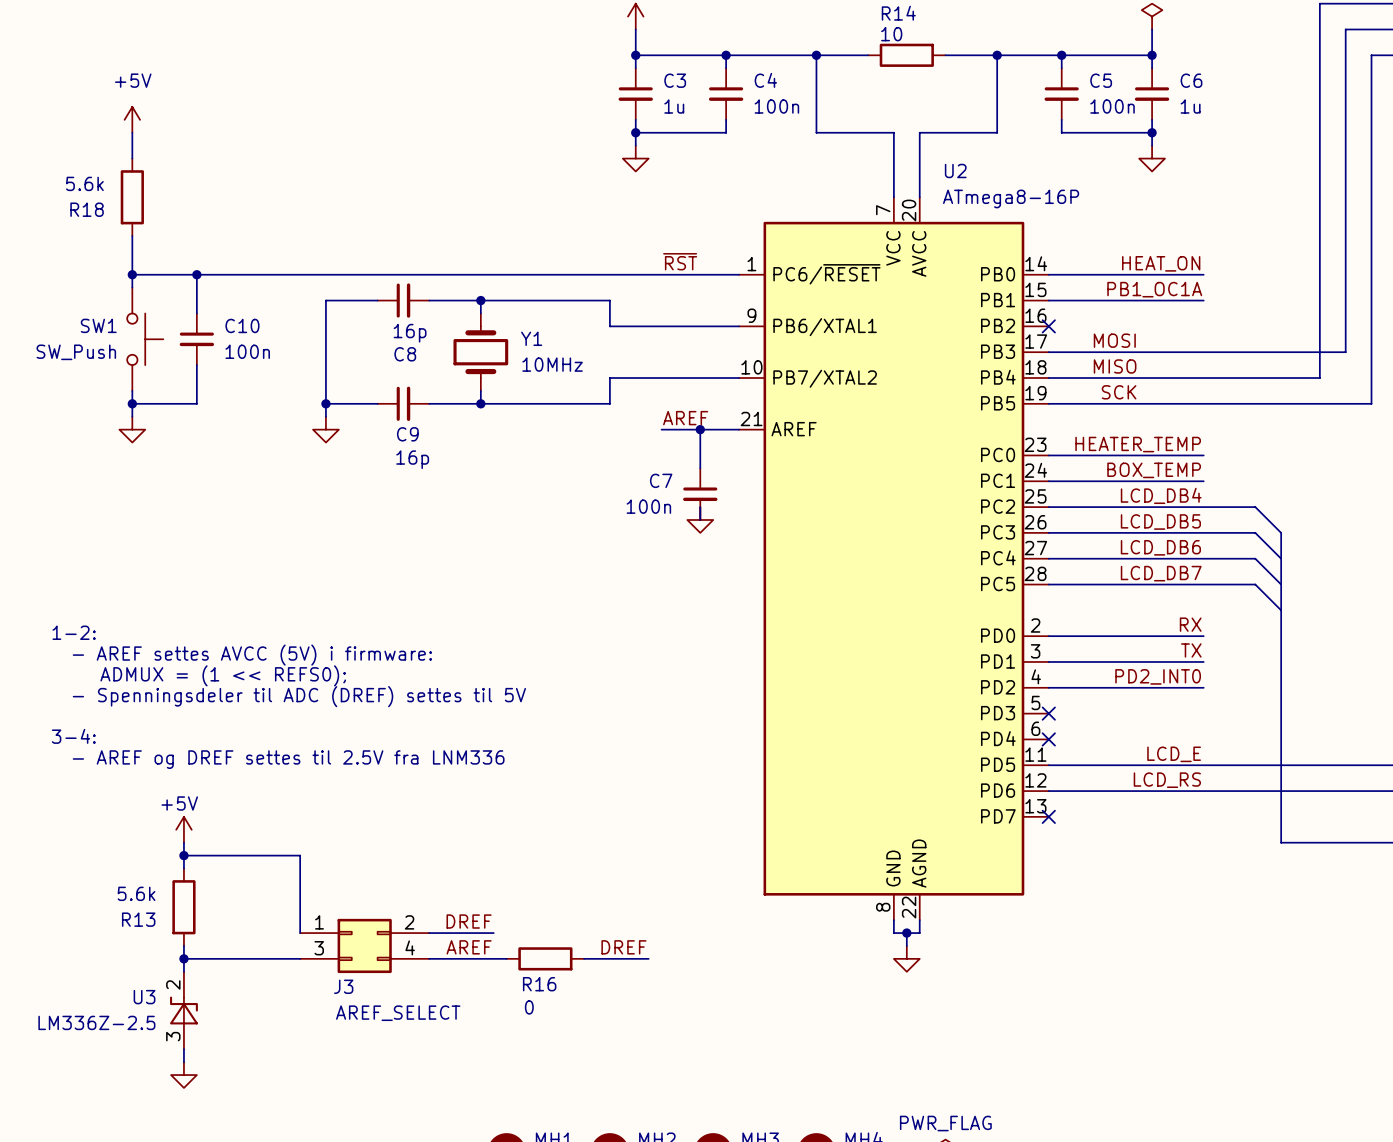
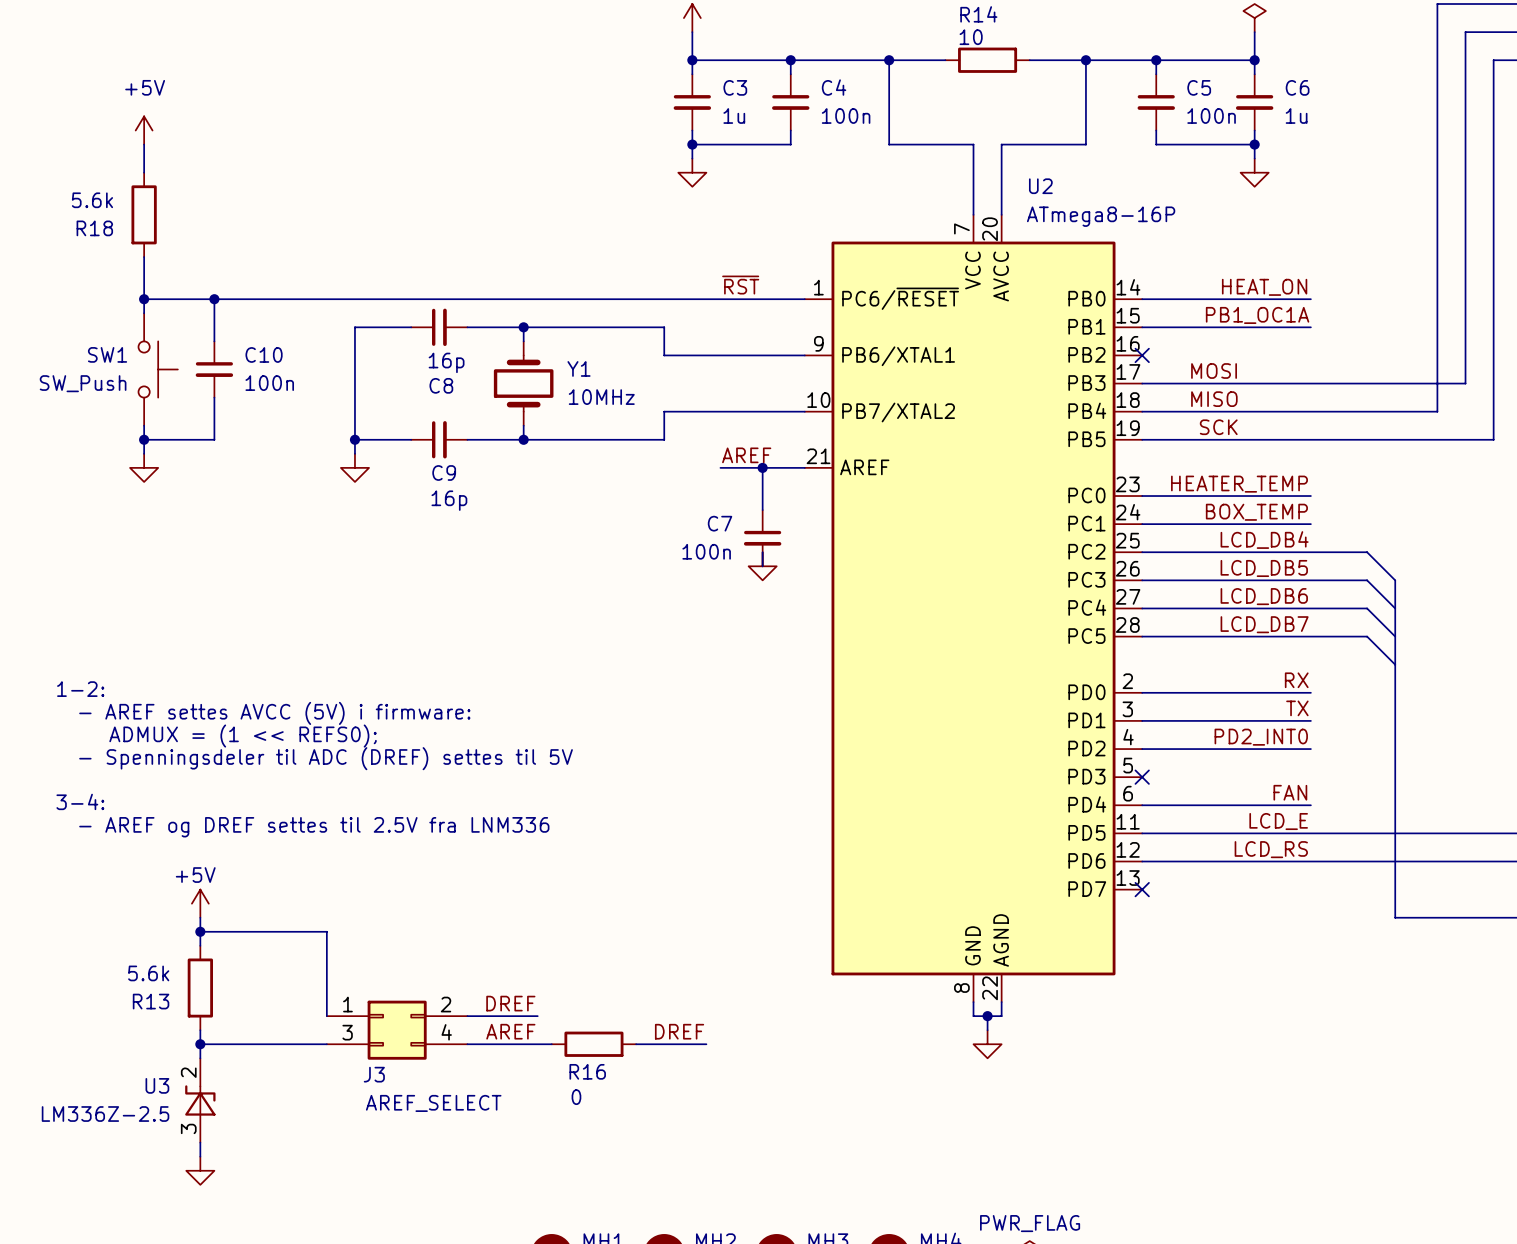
label: none -> FAN (1290, 792)
wire: none -> (1142, 805) (1310, 805)
no-connect mark: (1048, 739) -> none

